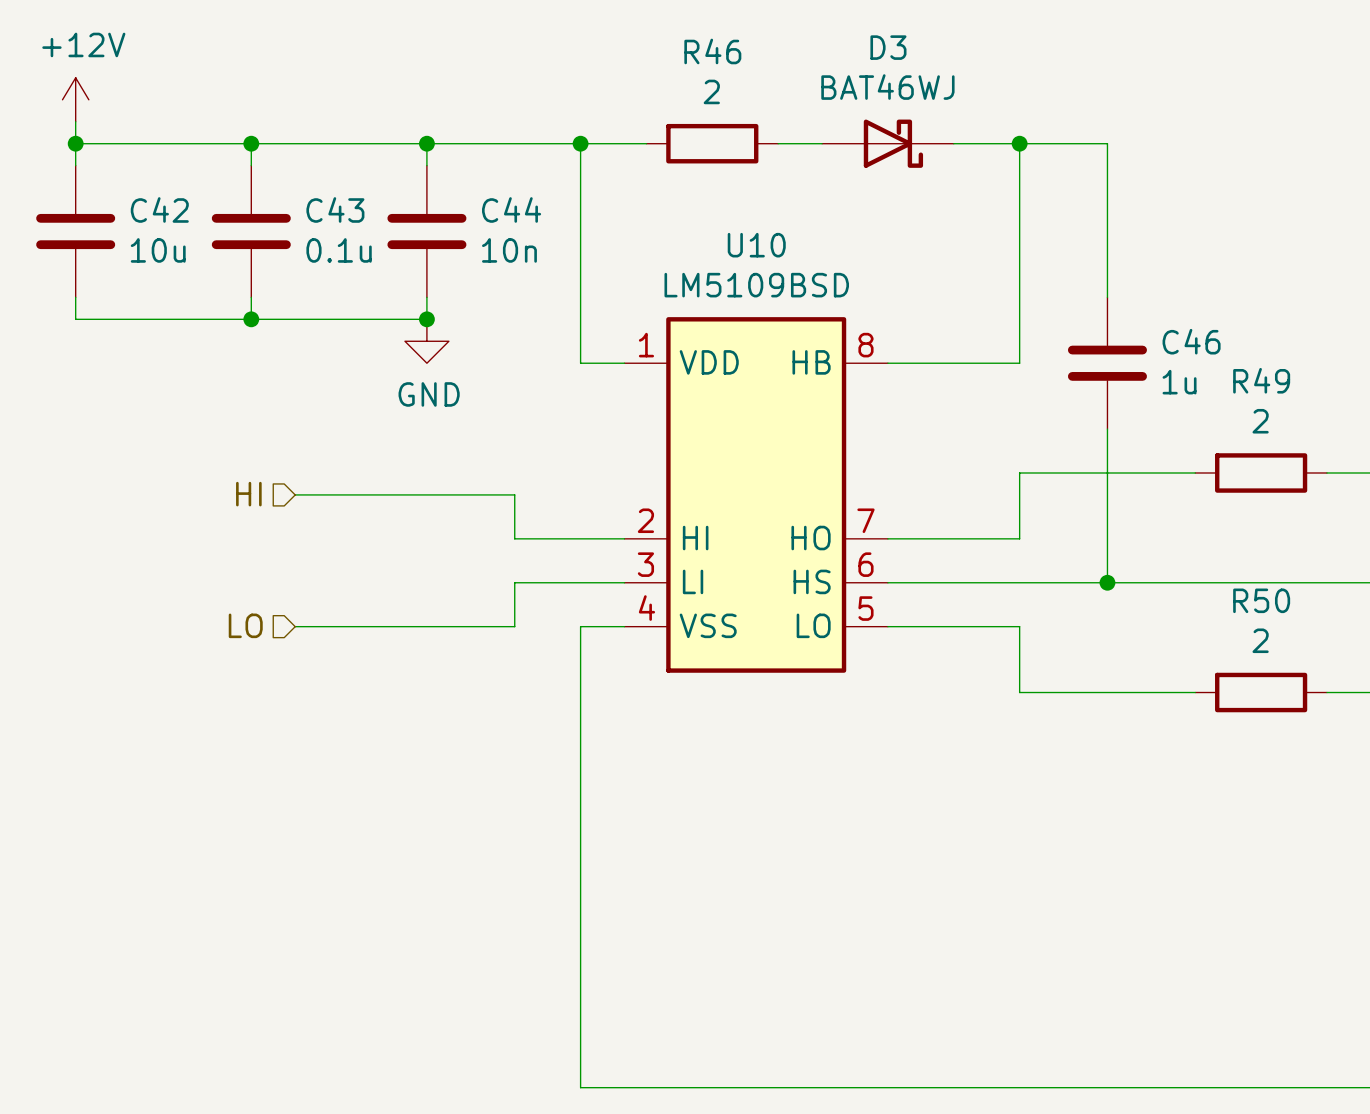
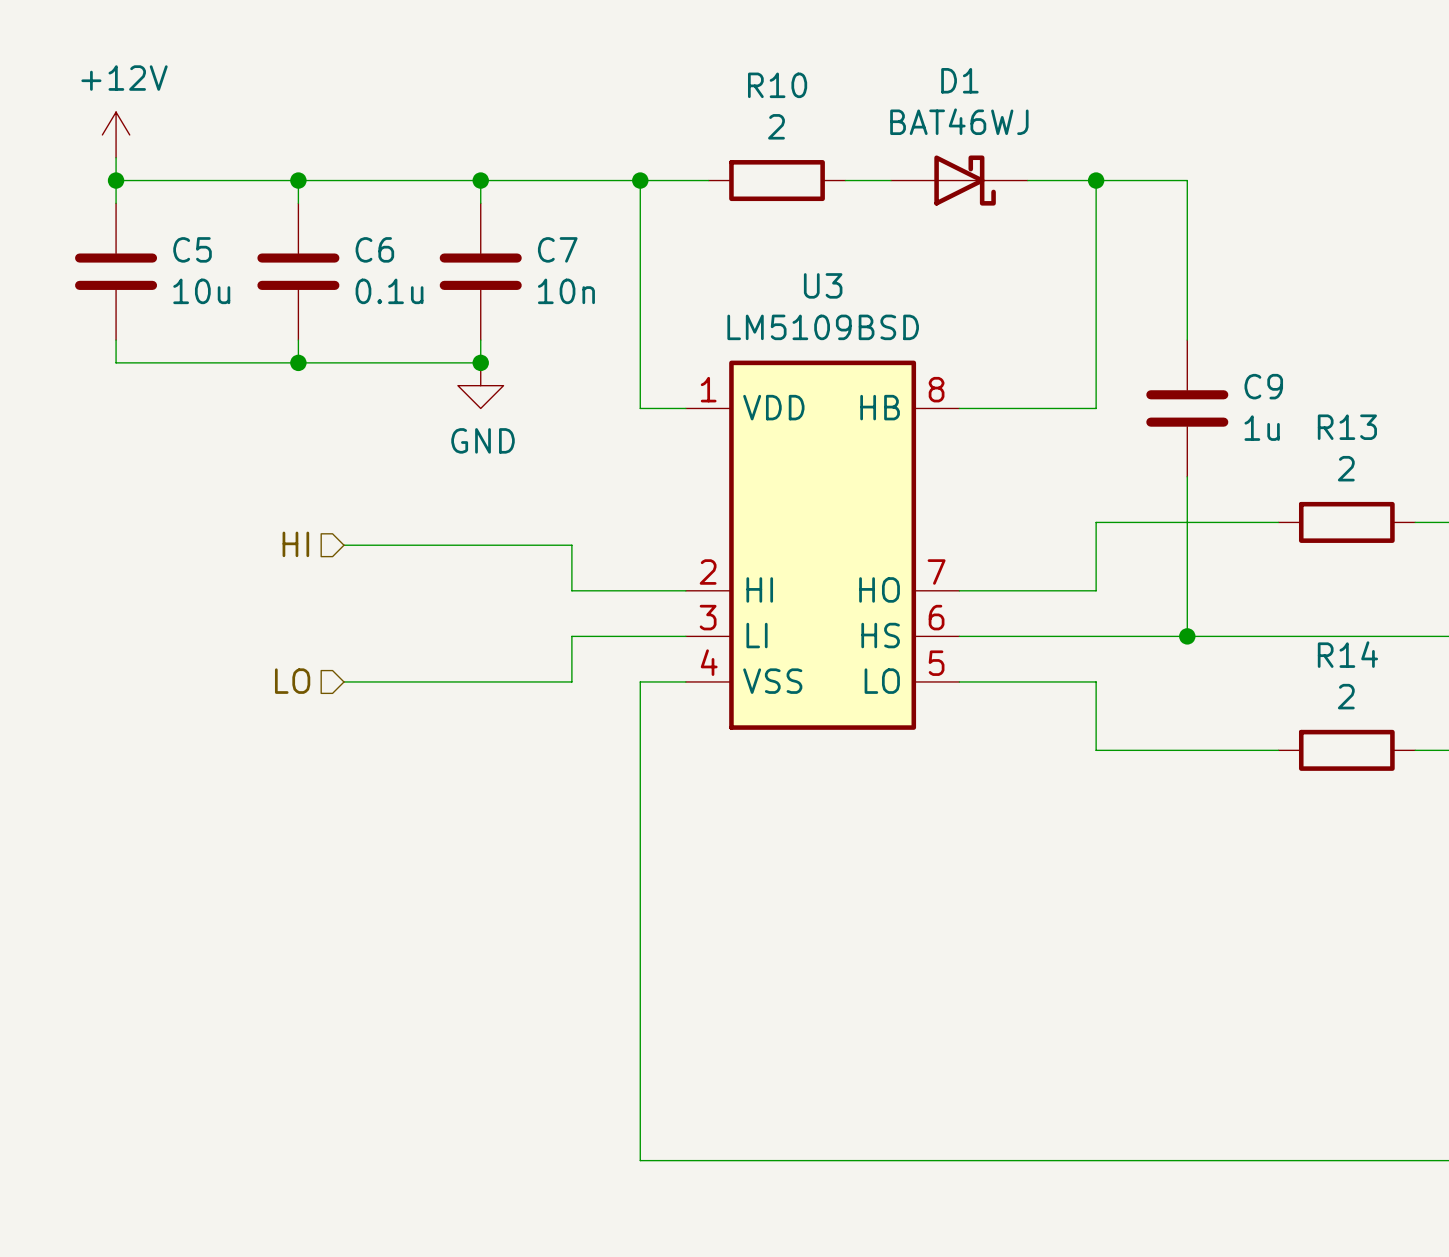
D3 name: D3 (888, 47) -> D1 (959, 80)
R46 name: R46 (712, 51) -> R10 (777, 85)
C42 name: C42 (159, 209) -> C5 (192, 249)
C43 name: C43 (335, 209) -> C6 (374, 249)
C44 name: C44 (511, 209) -> C7 (557, 249)
U10 name: U10 (756, 245) -> U3 (823, 285)
C46 name: C46 (1191, 341) -> C9 (1263, 386)
R49 name: R49 (1261, 380) -> R13 (1347, 427)
R50 name: R50 (1261, 600) -> R14 (1347, 654)

